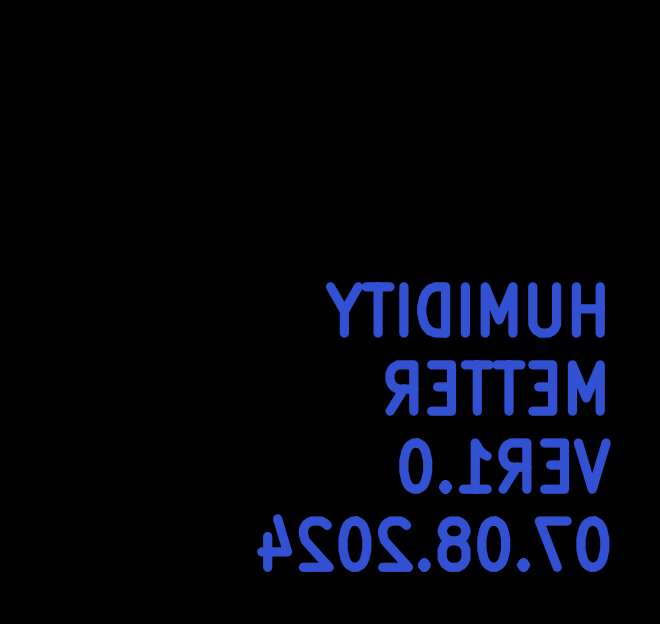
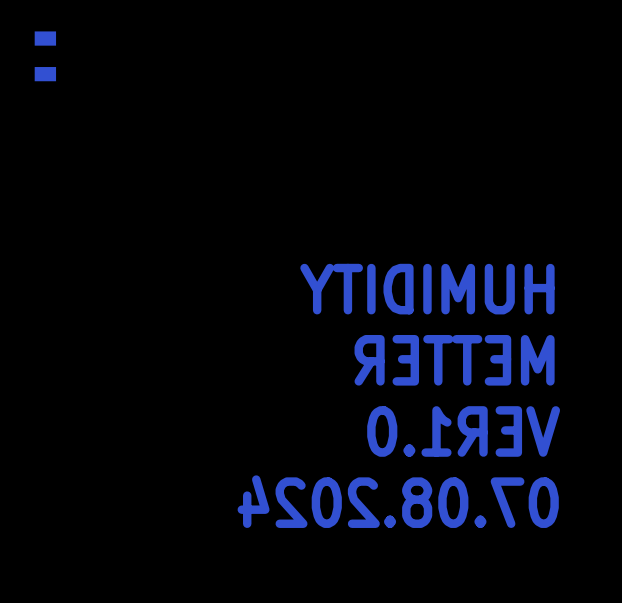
part: none -> (45, 56)

